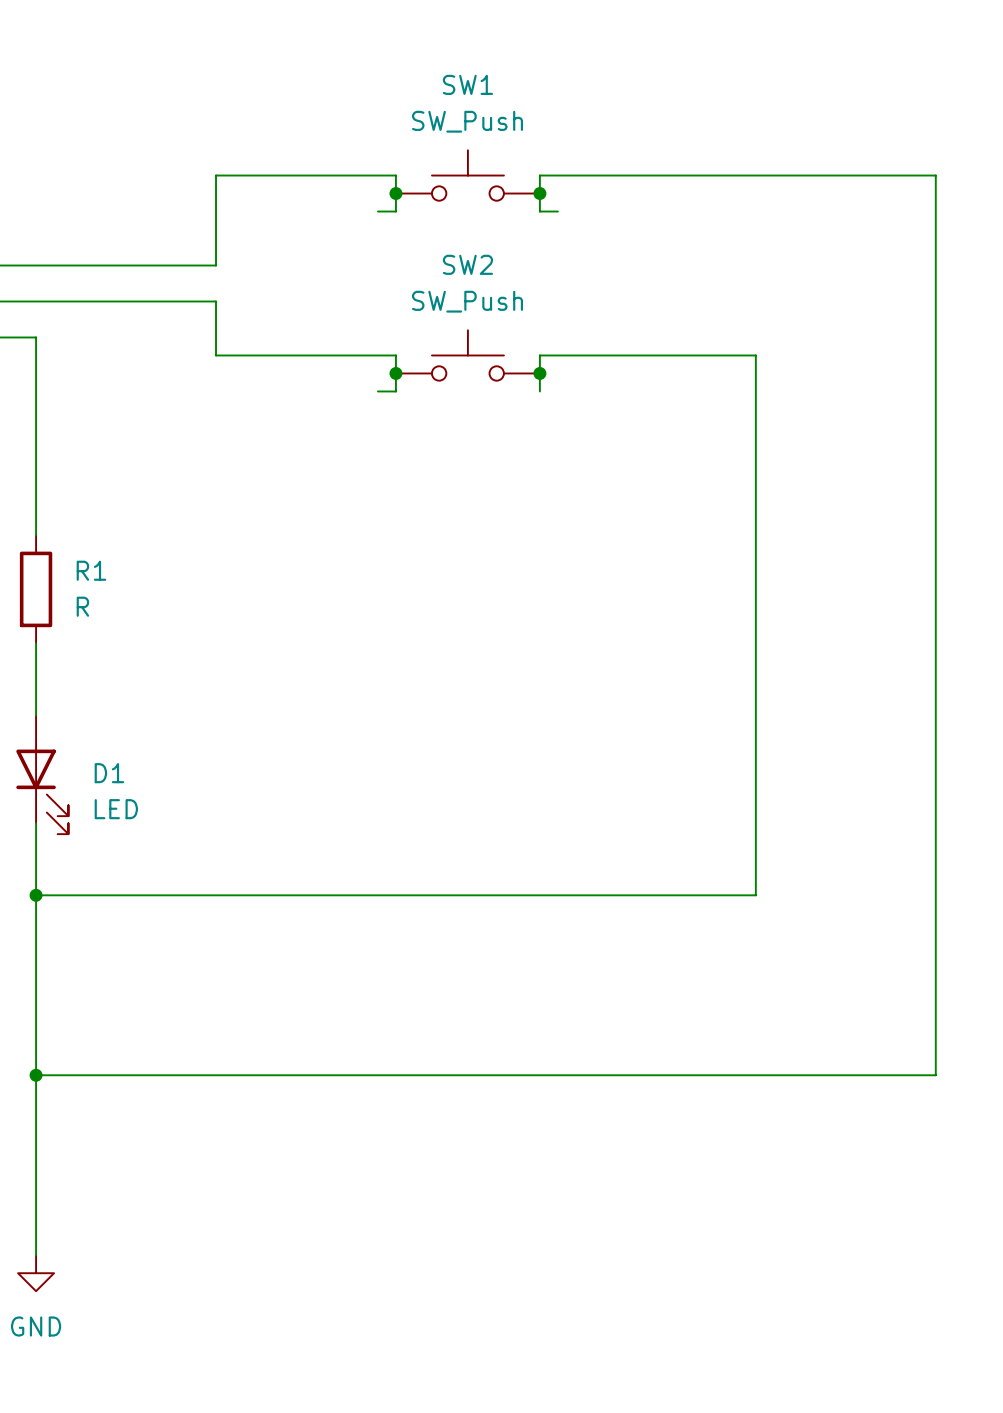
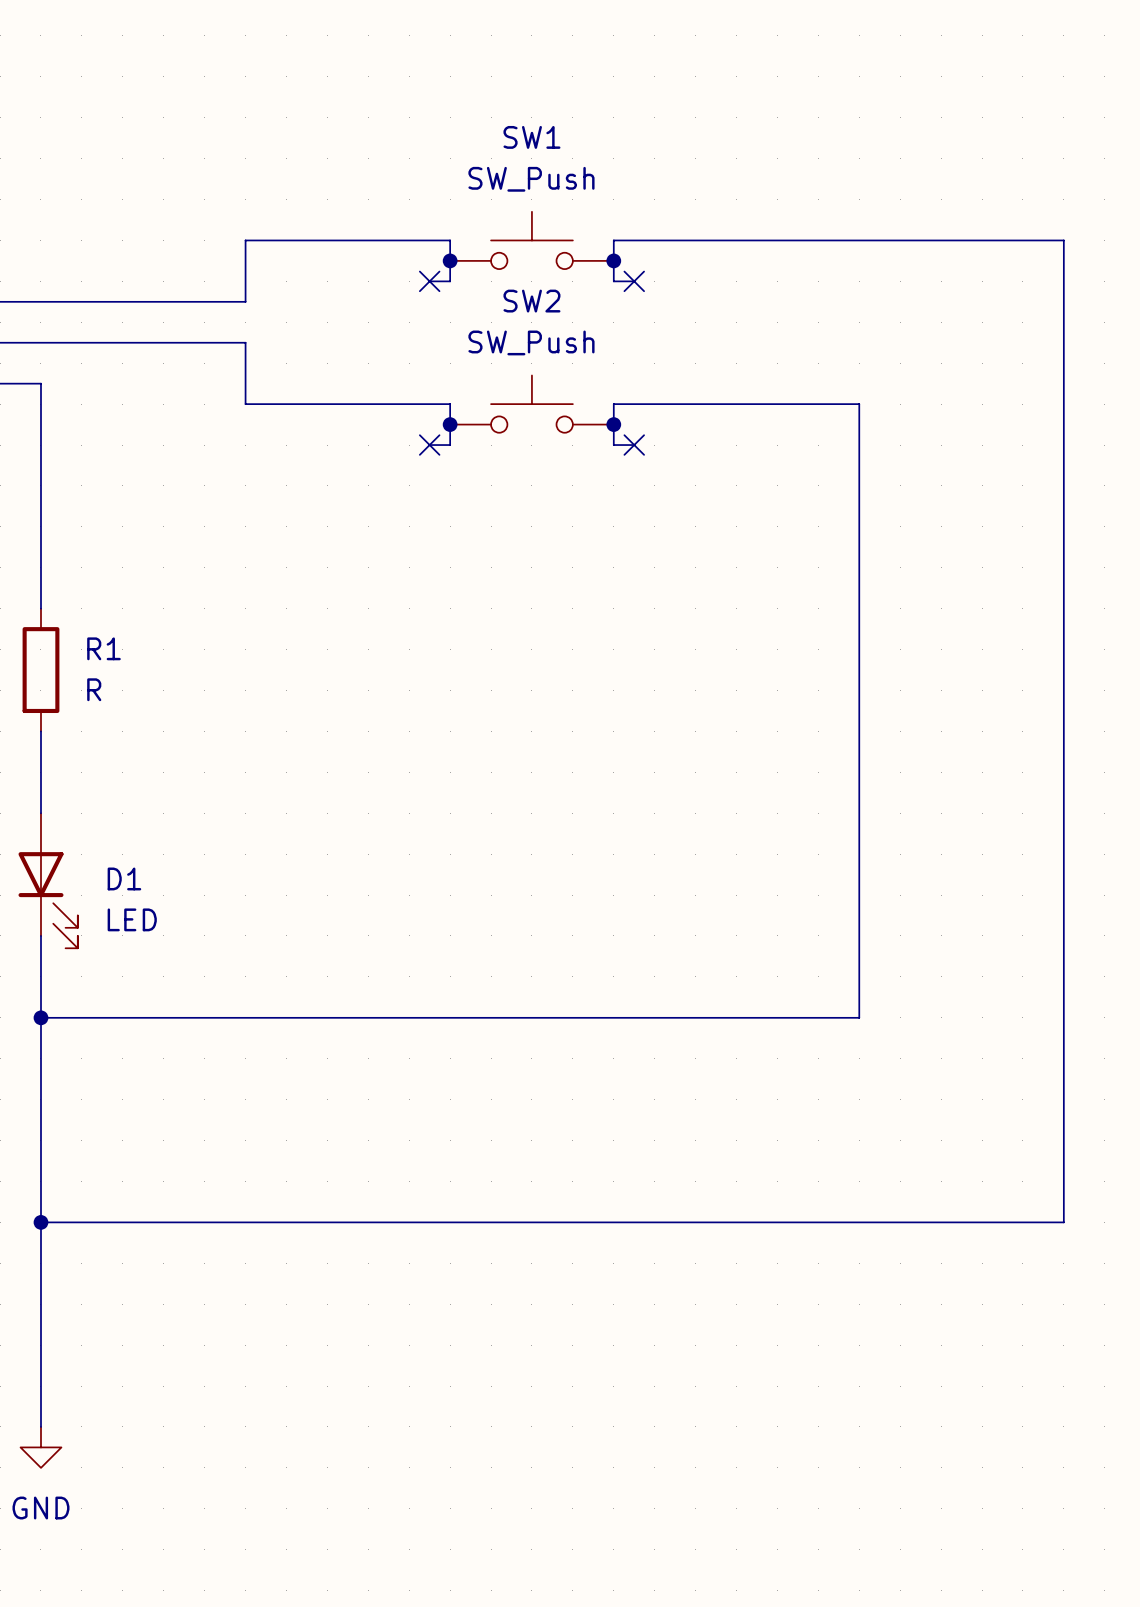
SW1 position: (467, 175) -> (531, 240)
junction position: (395, 193) -> (450, 260)
junction position: (539, 193) -> (613, 260)
wire: (216, 211) (216, 175) (395, 175) (395, 211) -> (245, 240) (429, 240)
wire: none -> (450, 240) (450, 281) (429, 281)
wire: (539, 211) (539, 175) (935, 175) (935, 211) -> (634, 240) (1063, 240)
wire: none -> (613, 240) (613, 281) (634, 281)
no-connect mark: none -> (429, 281)
no-connect mark: none -> (634, 281)
no-connect mark: none -> (429, 445)
wire: none -> (613, 445) (634, 445)
no-connect mark: none -> (634, 445)

